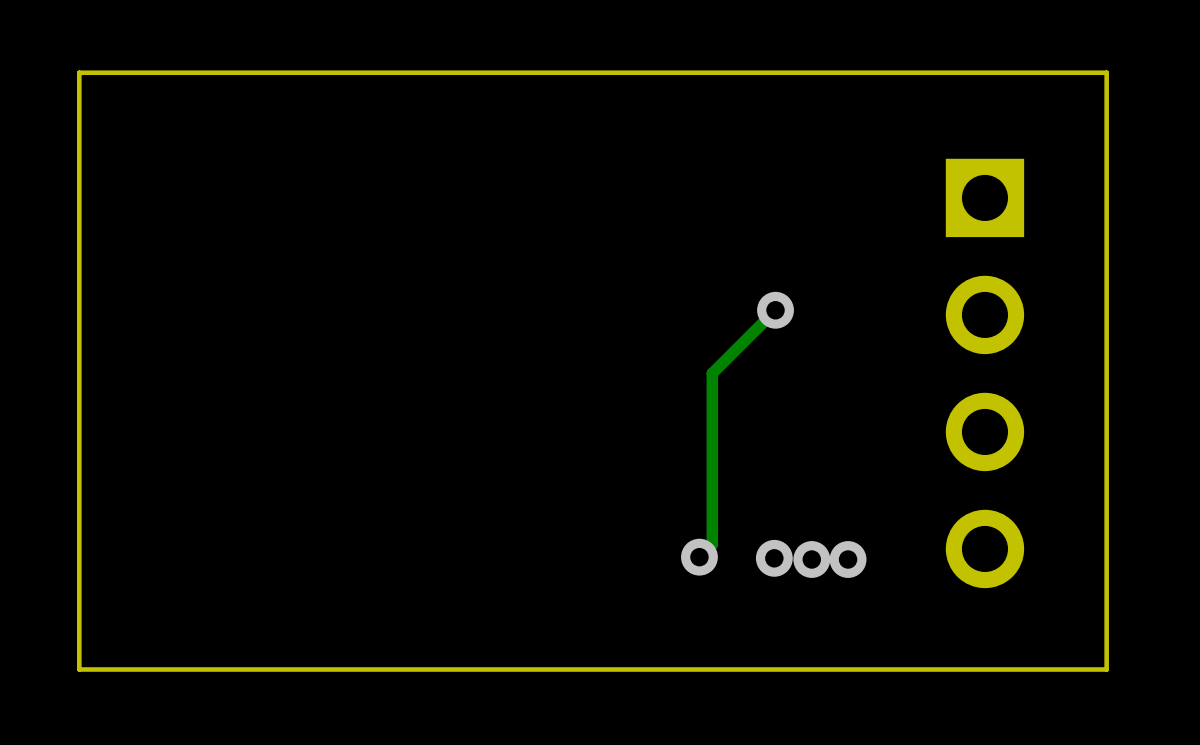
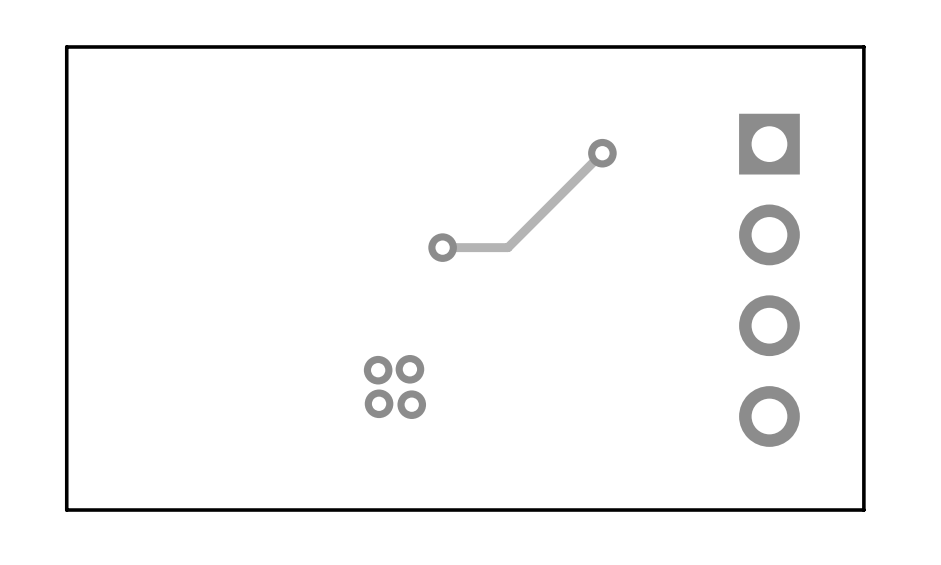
track: none -> (602, 153) (507, 247) (442, 247)
track: (775, 310) (712, 373) (712, 544) (699, 557) -> none
via position: (775, 310) -> (602, 153)
via: none -> (442, 247)
via: none -> (409, 369)
via: none -> (378, 370)
via: none -> (379, 403)
via: none -> (411, 404)
via: (699, 557) -> none
via: (774, 558) -> none
via: (811, 559) -> none
via: (848, 559) -> none

